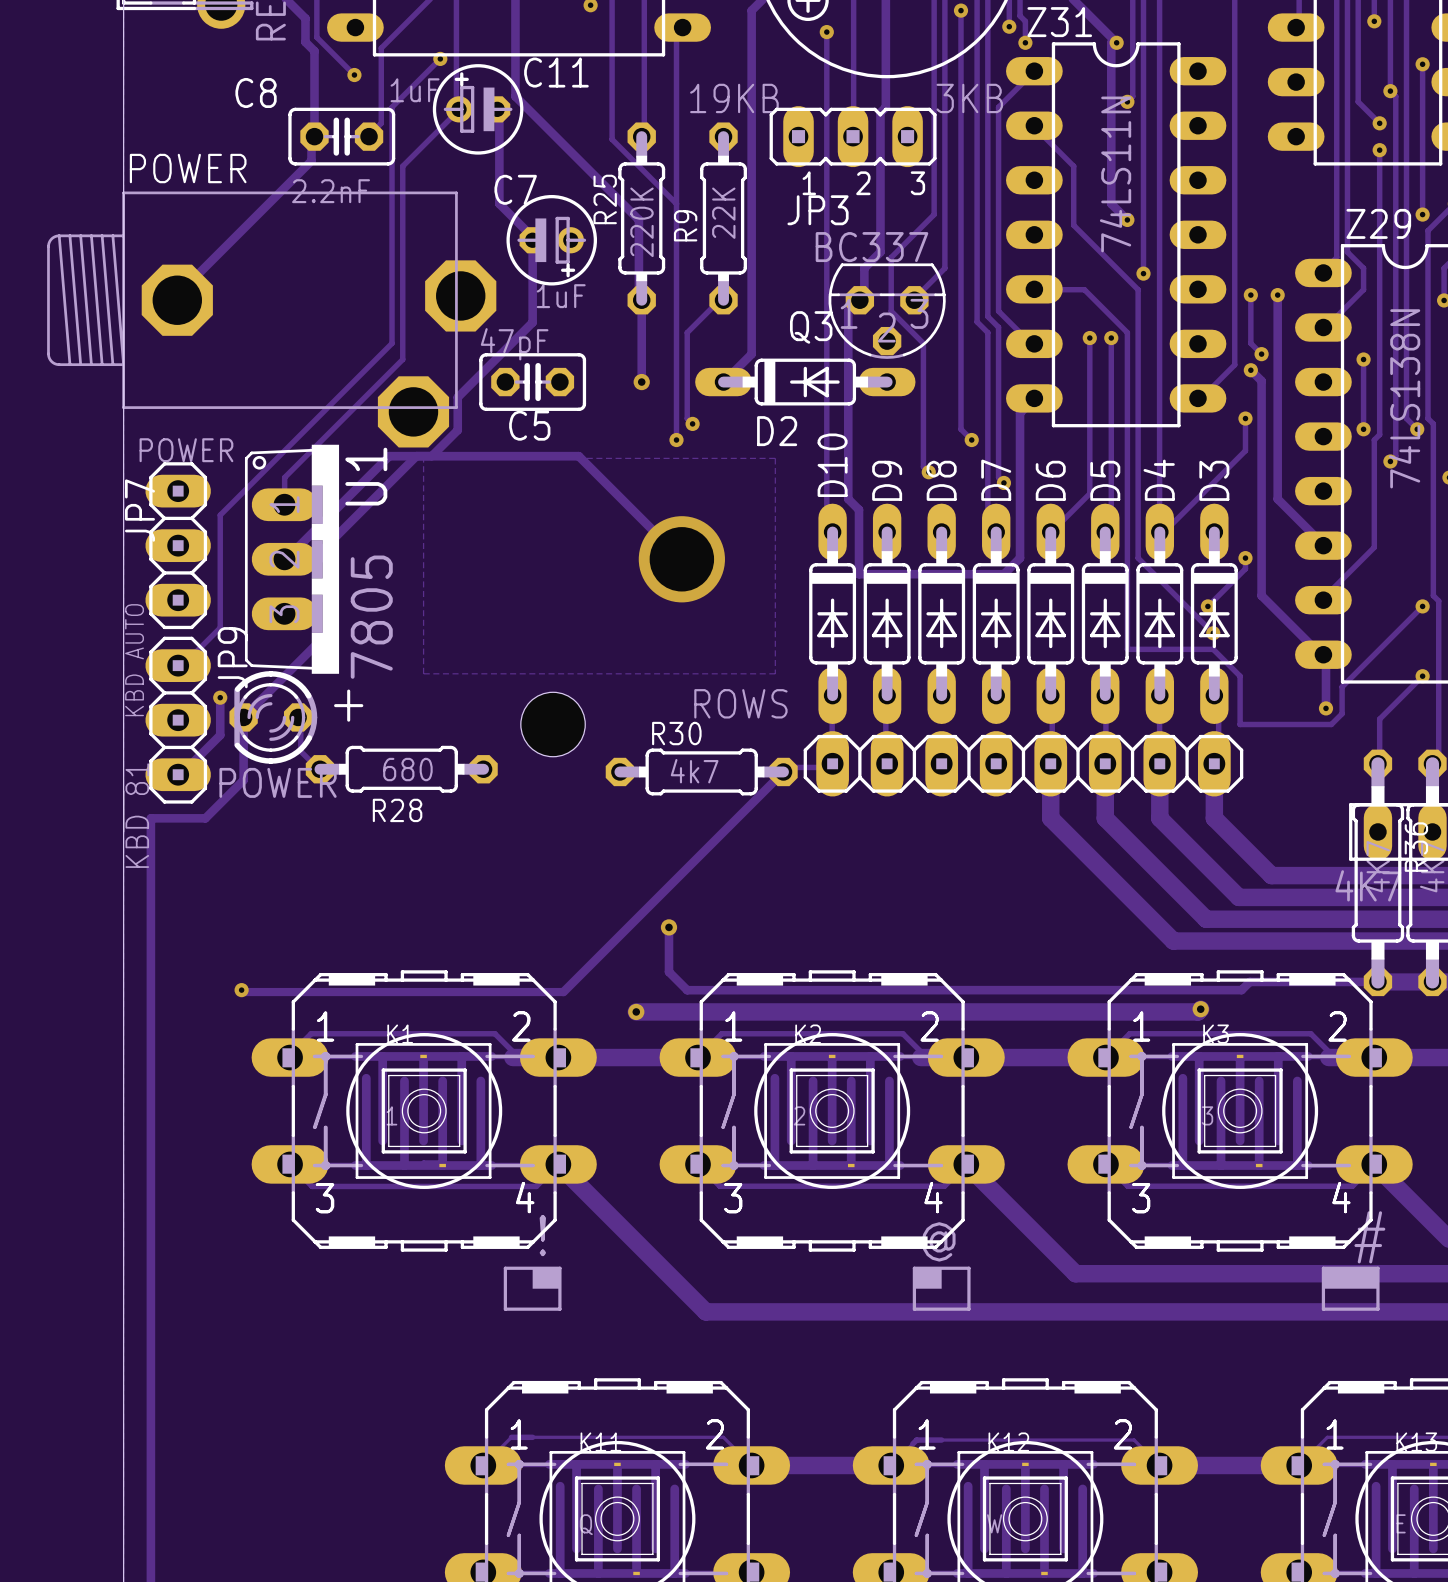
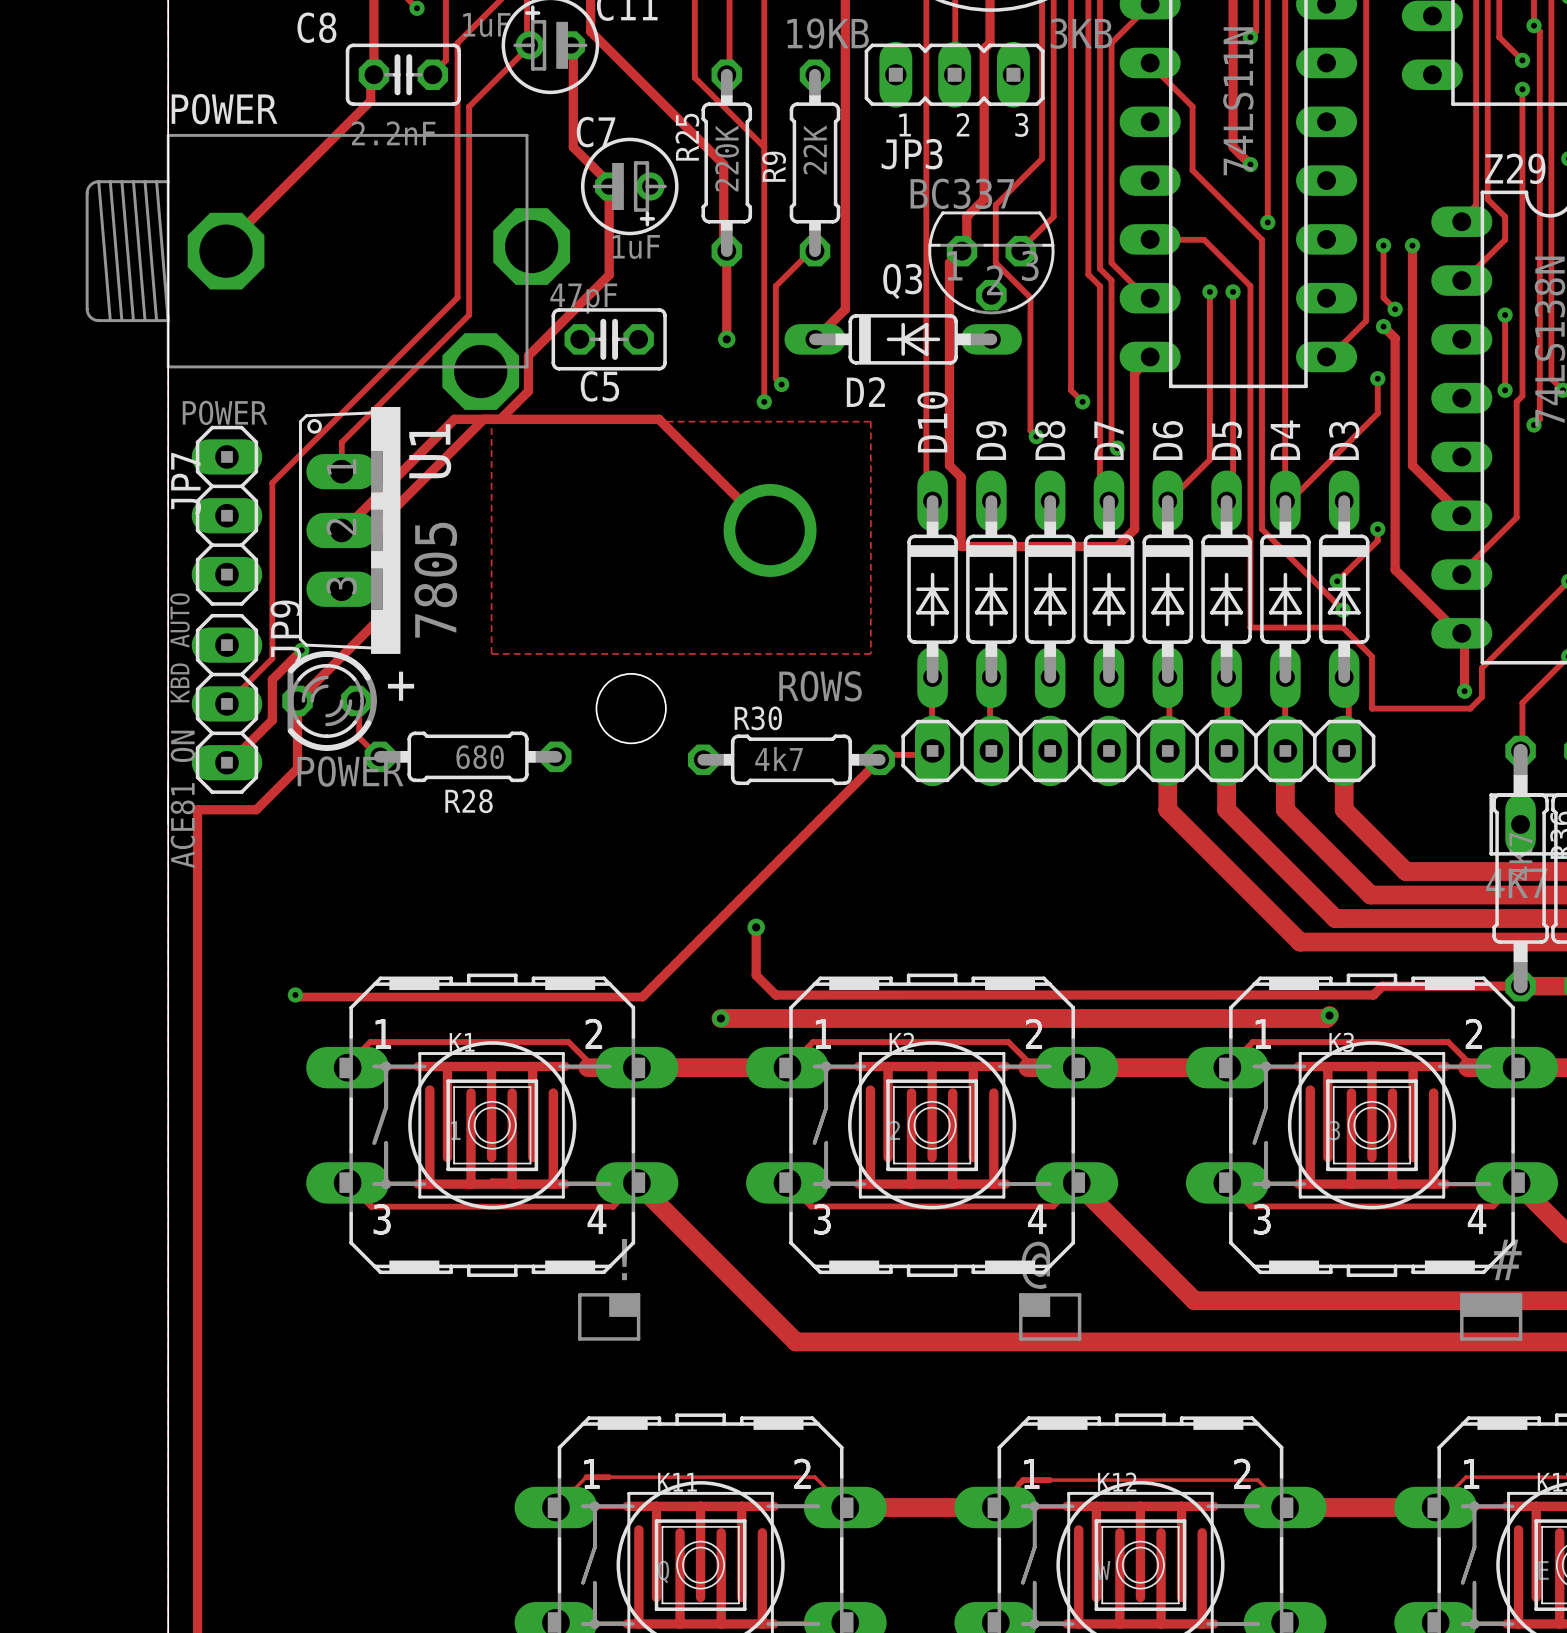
track: (220, 627) (182, 665) (178, 665) -> (272, 604) (272, 658) (226, 703)
track: none -> (301, 650) (272, 679)
via position: (220, 697) -> (301, 650)
text: KBD 81 (137, 815) -> ACE81 ON (182, 799)

